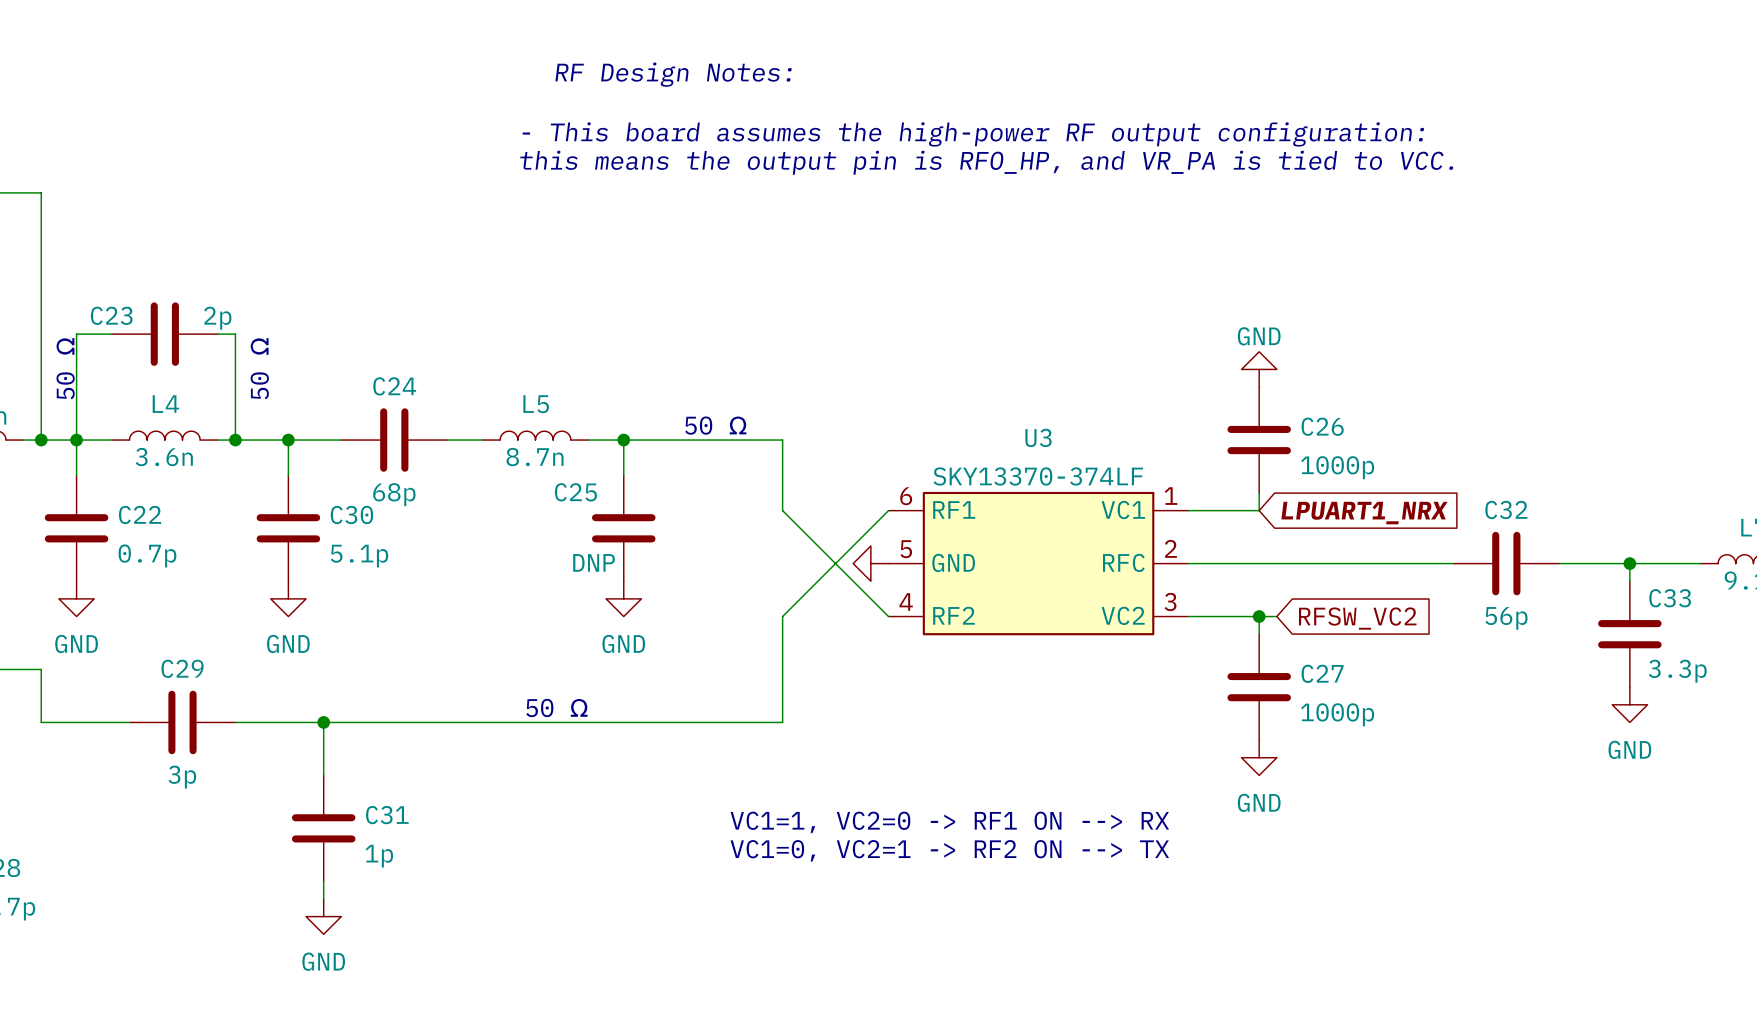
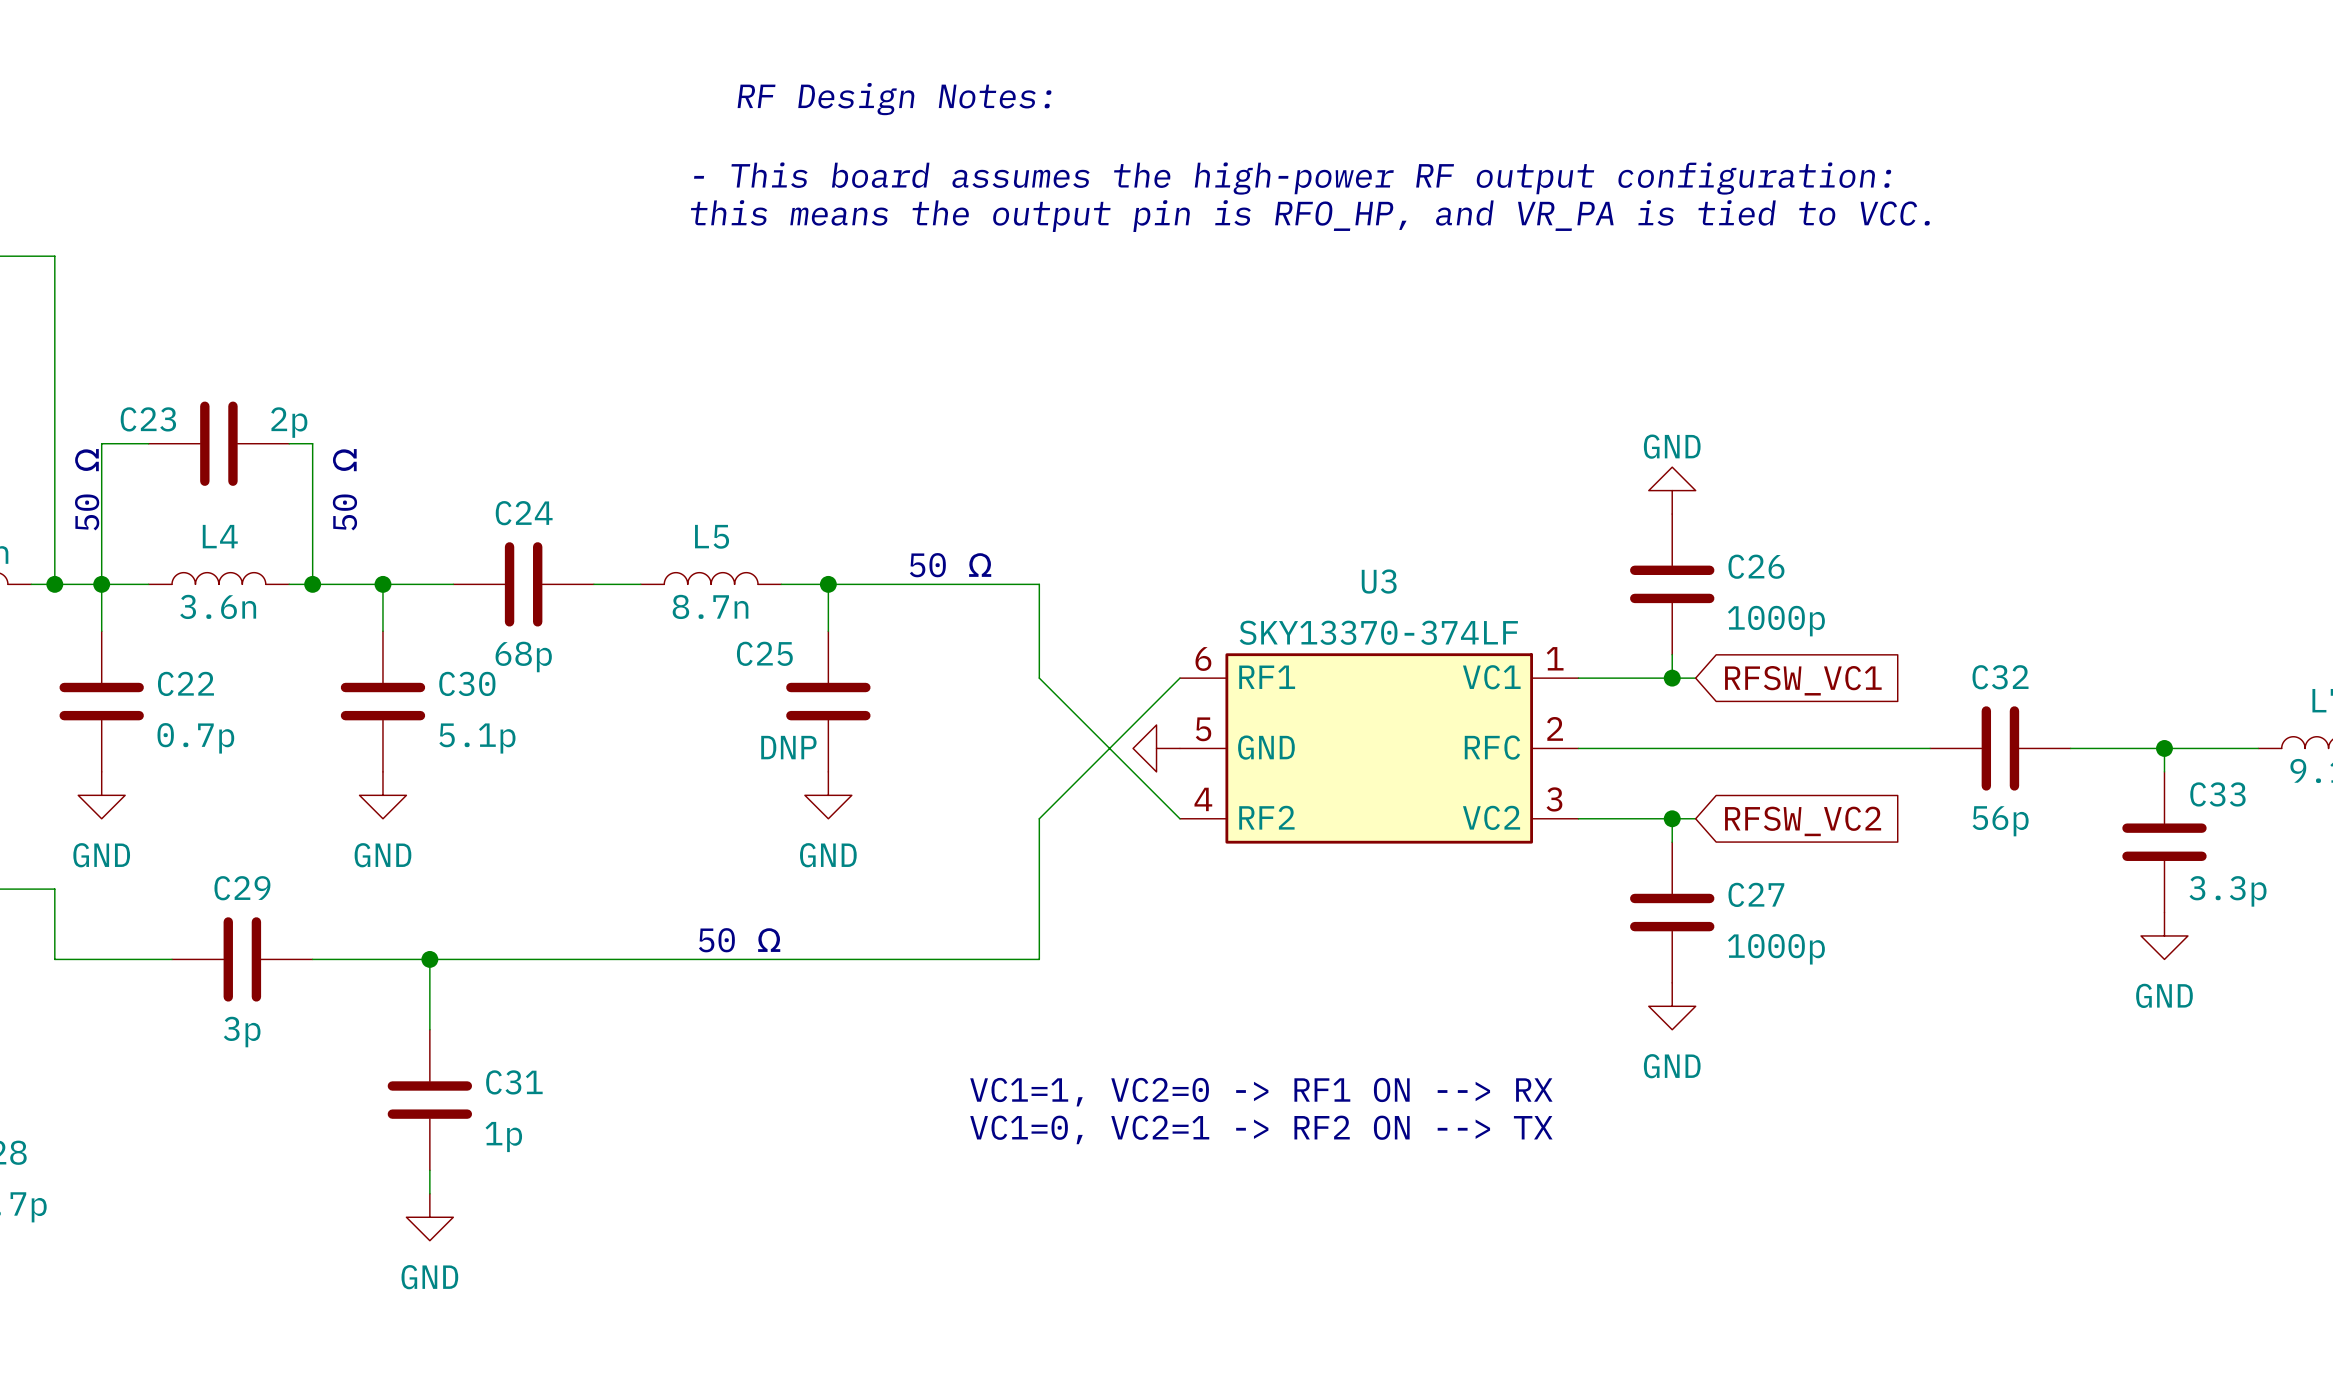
wire: none -> (1672, 678) (1695, 678)
junction: none -> (1672, 678)
global label: none -> RFSW_VC1 (1803, 680)
global label: LPUART1_NRX (1364, 513) -> none

